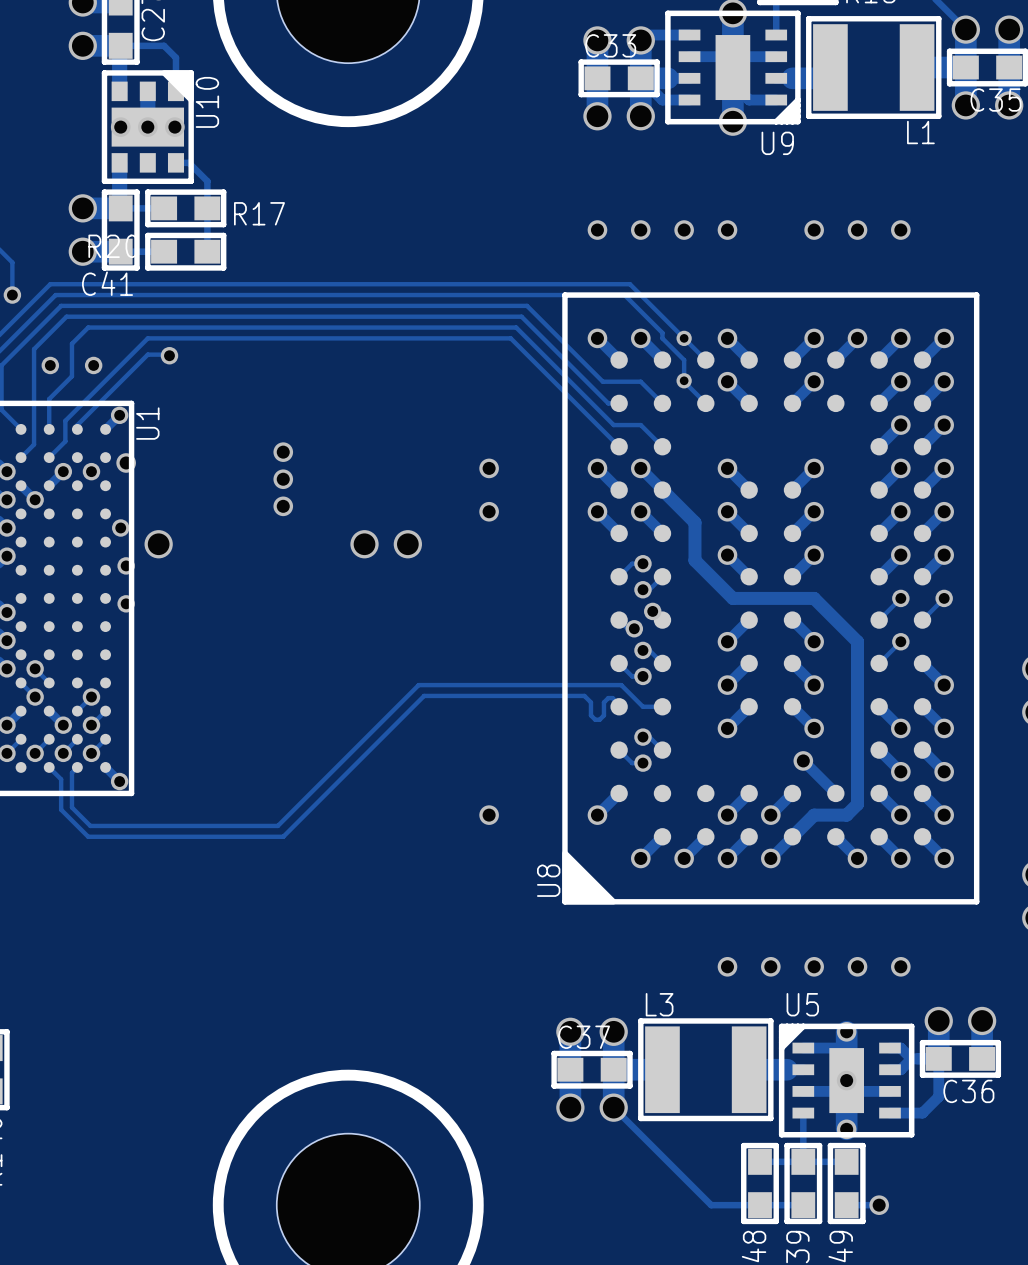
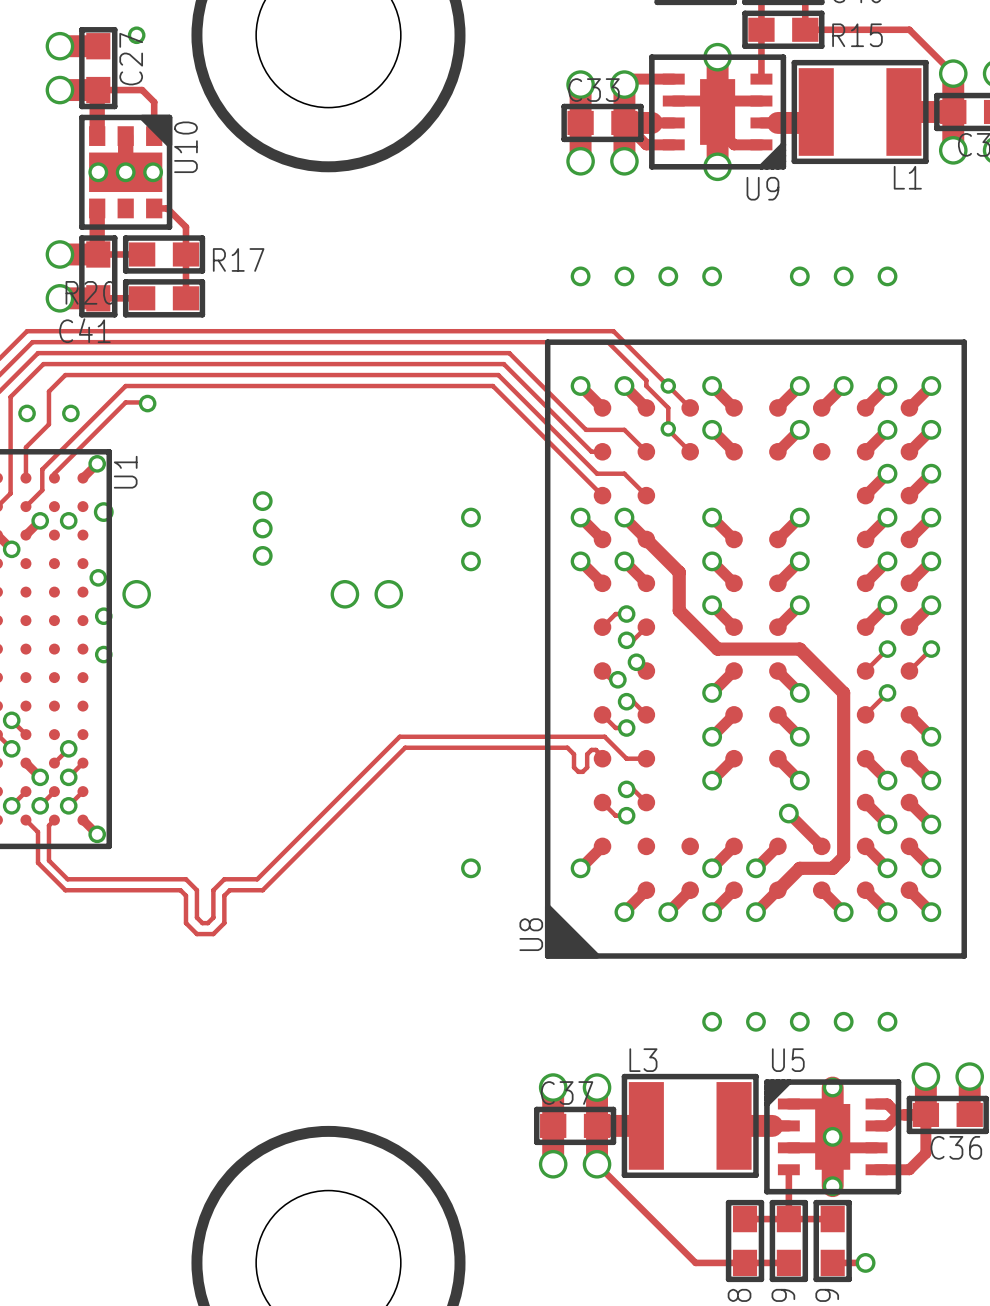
track: (207, 825) (245, 825) -> (185, 879) (196, 890) (196, 917) (202, 923) (207, 923) (213, 917) (213, 890) (224, 879)
track: (201, 836) (250, 836) -> (180, 890) (185, 895) (185, 923) (196, 934) (213, 934) (224, 923) (224, 895) (229, 890)

